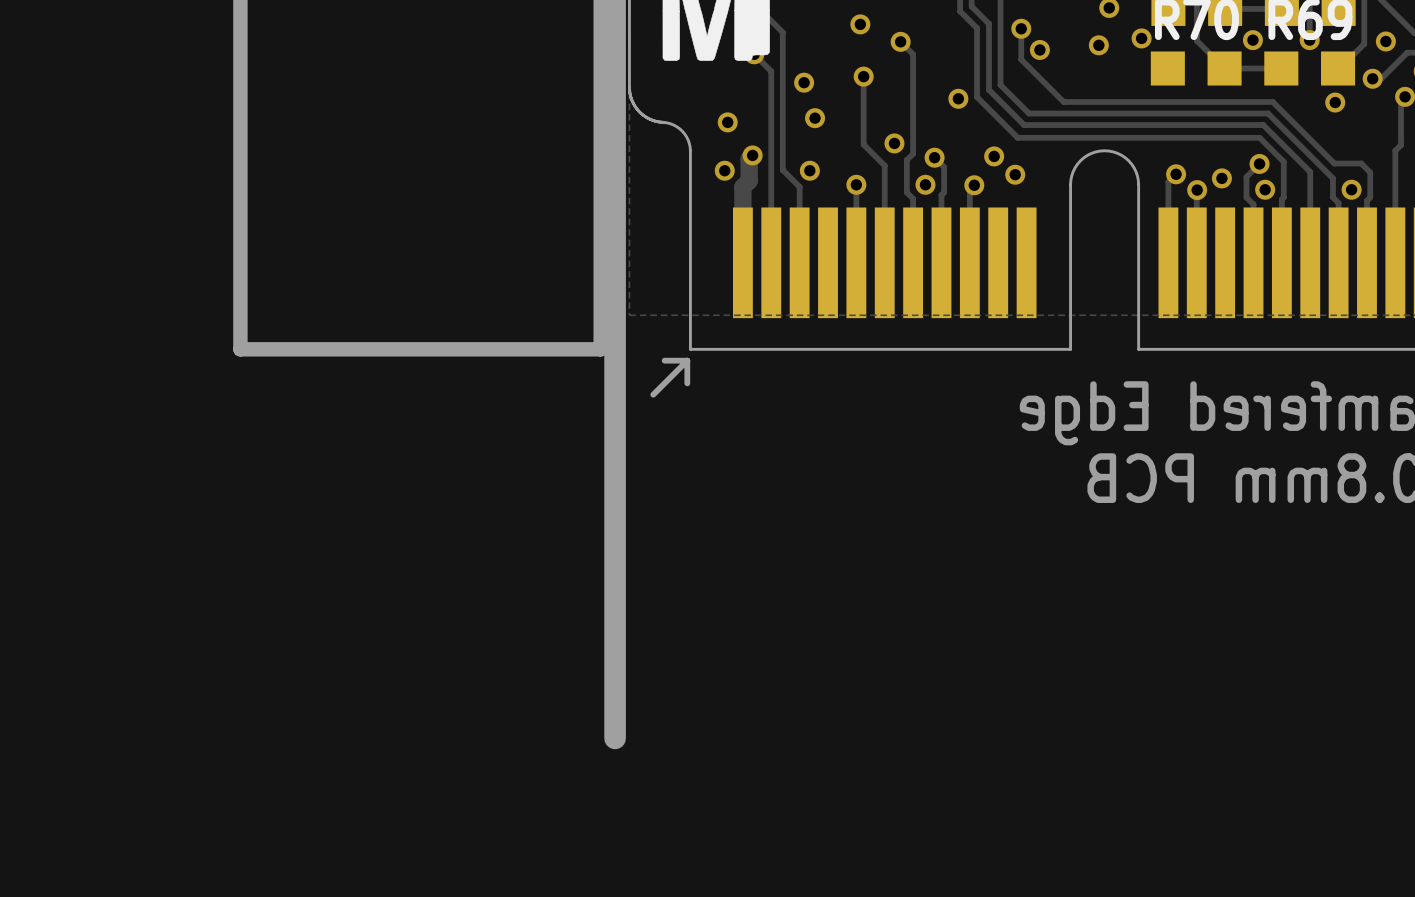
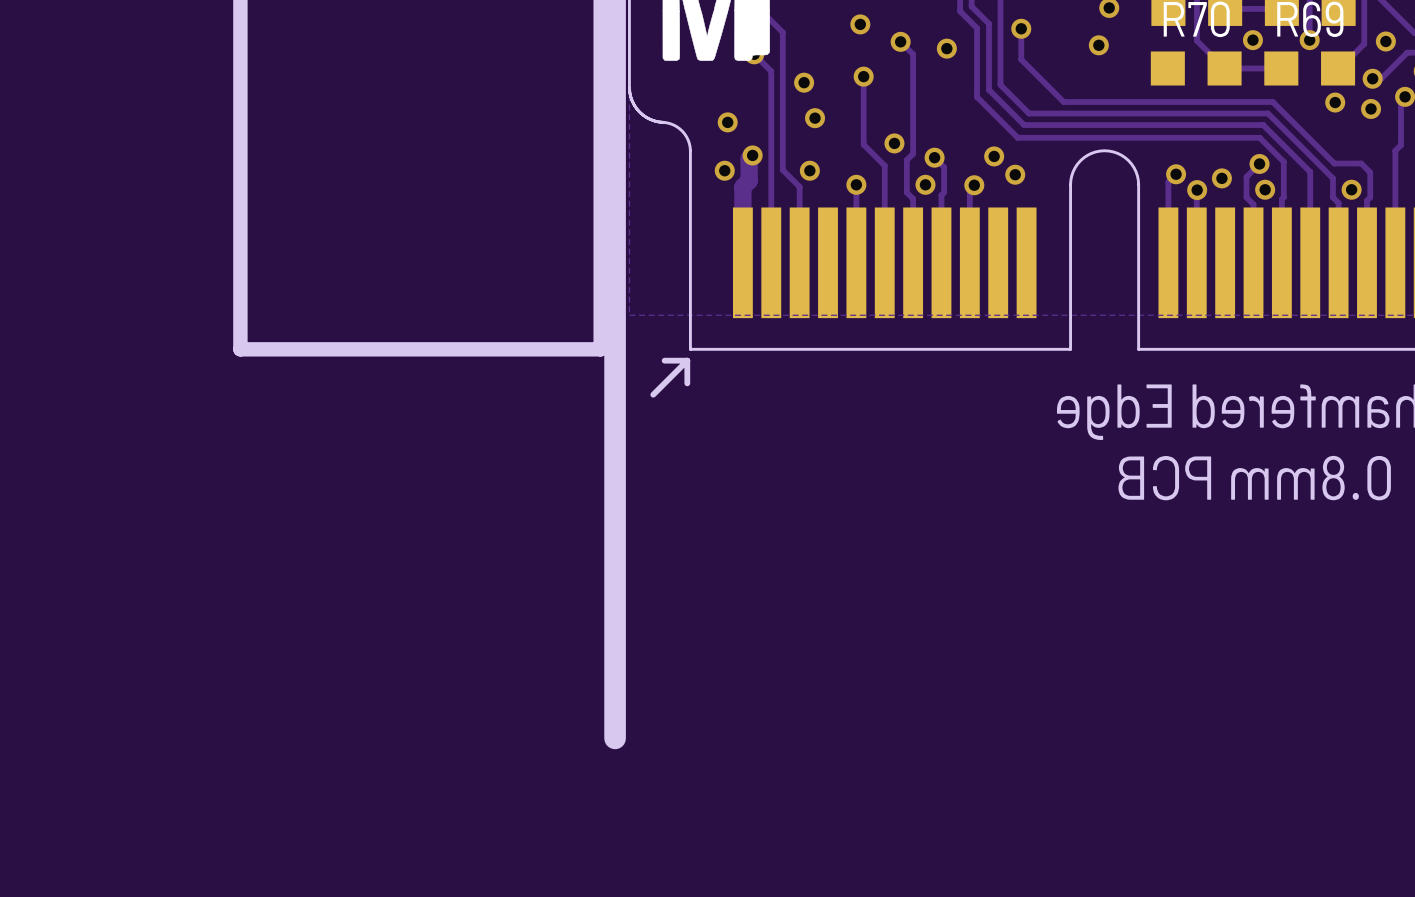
via: (1141, 38) -> none
via: none -> (946, 48)
via: (1039, 49) -> none
via: (958, 98) -> none
via: none -> (1371, 108)

